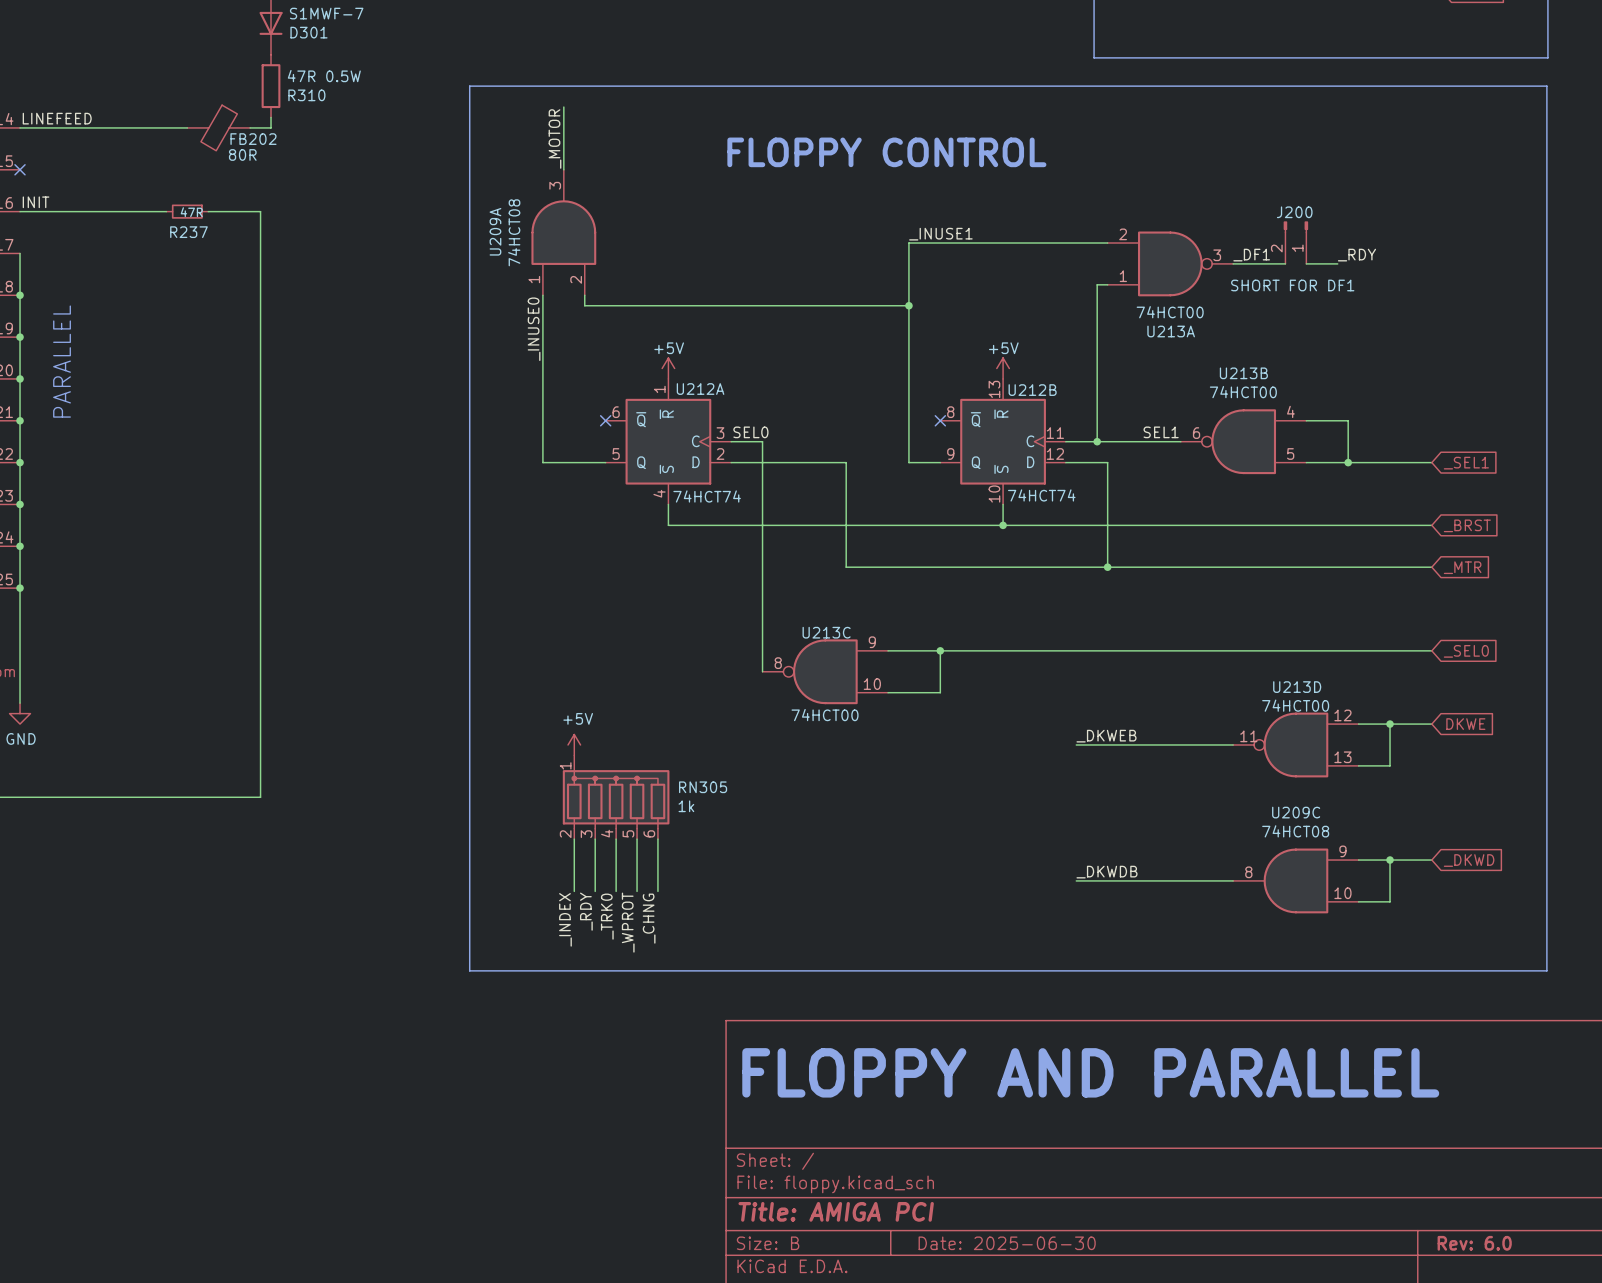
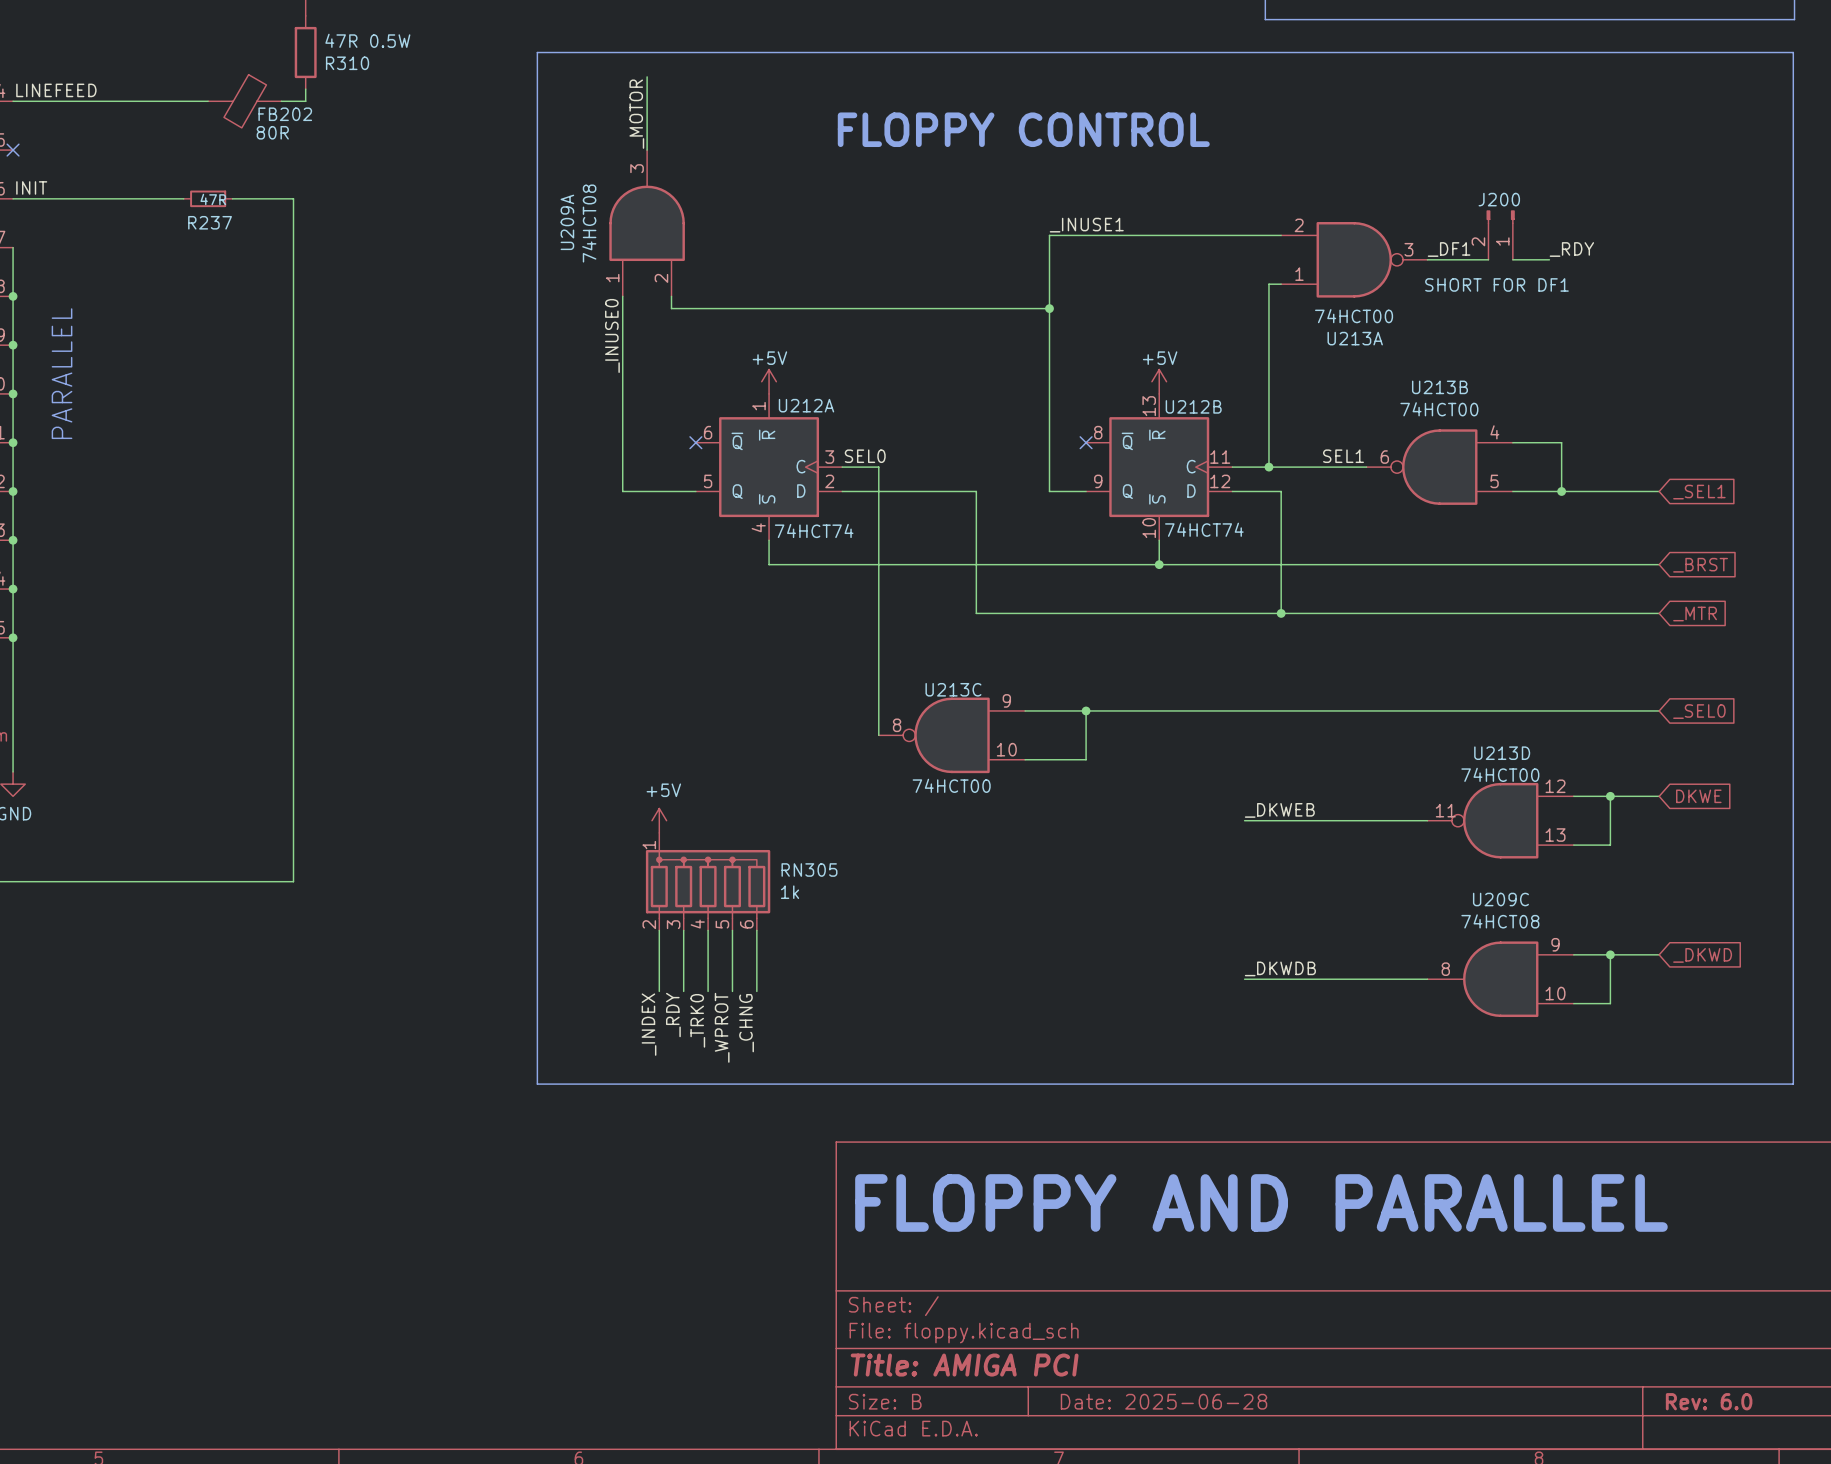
title block: Date: 2025-06-30 (1007, 1243) -> Date: 2025-06-28 (1164, 1401)

